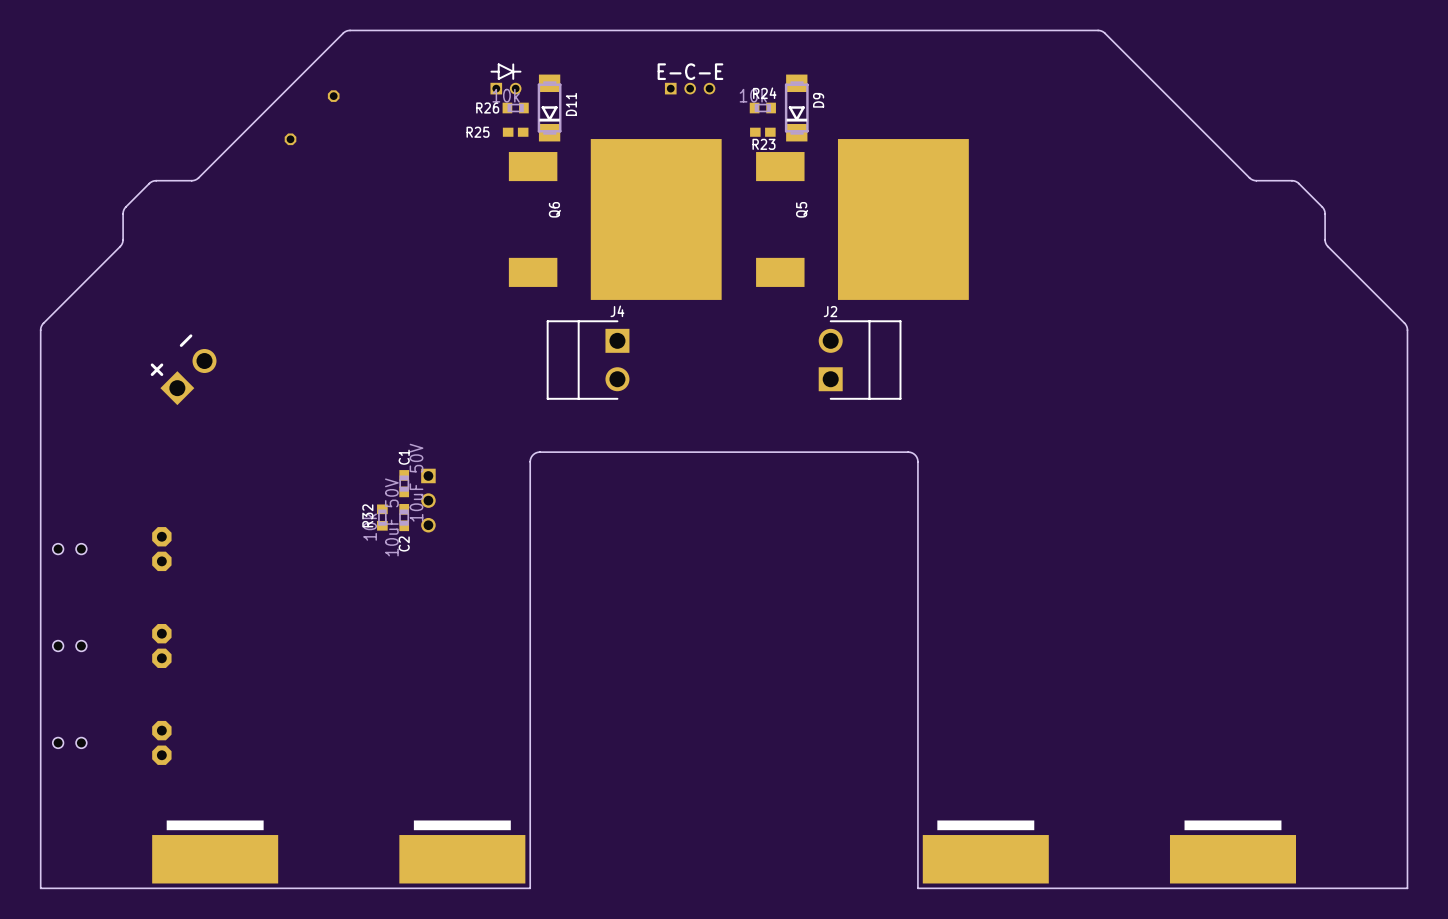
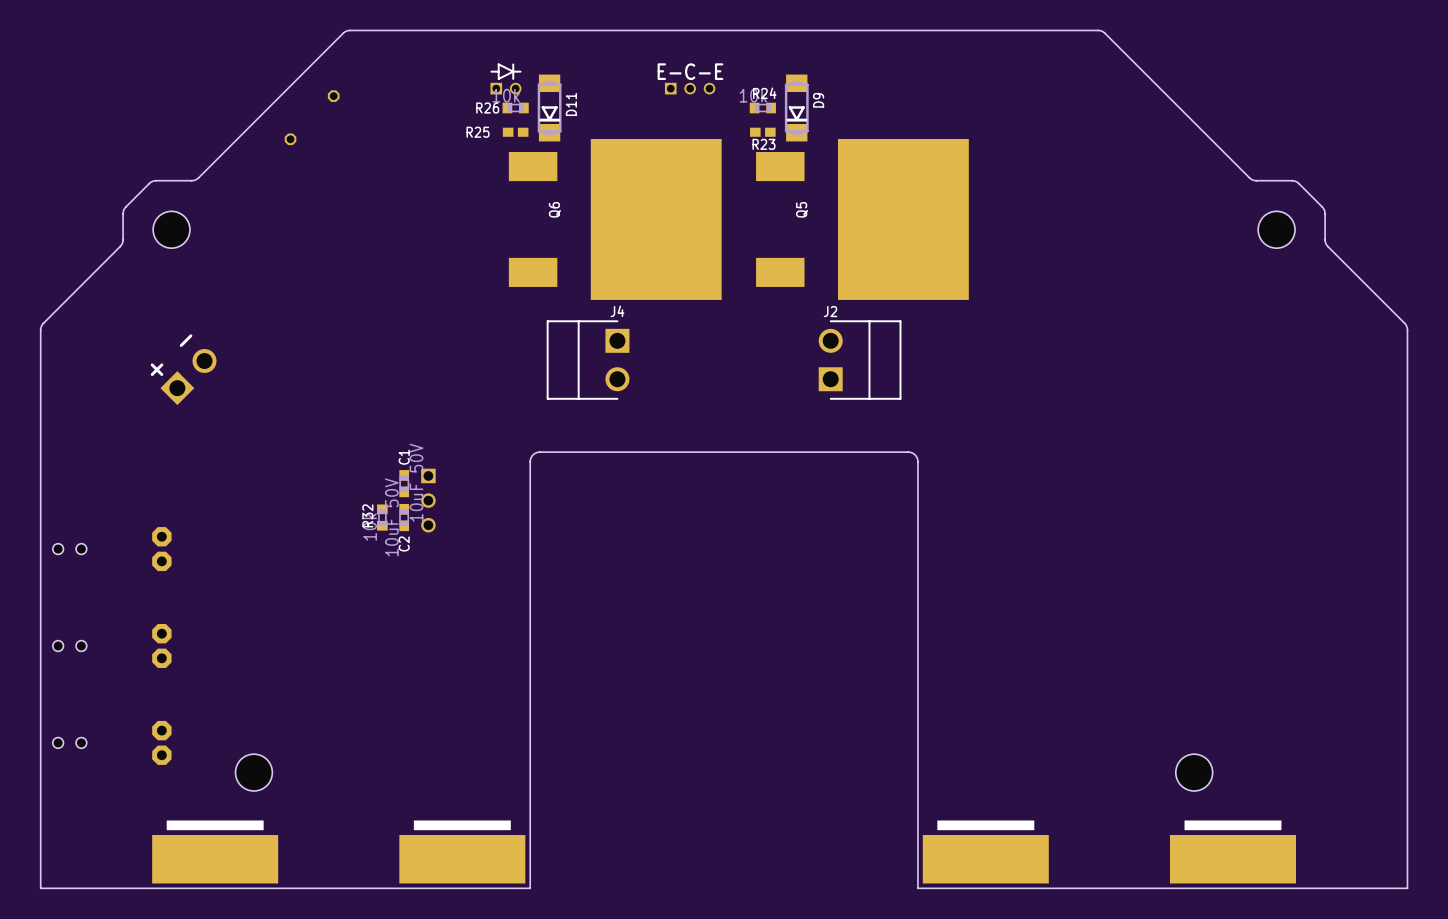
hole: none -> (171, 229)
hole: none -> (1276, 229)
hole: none -> (253, 772)
hole: none -> (1194, 772)

